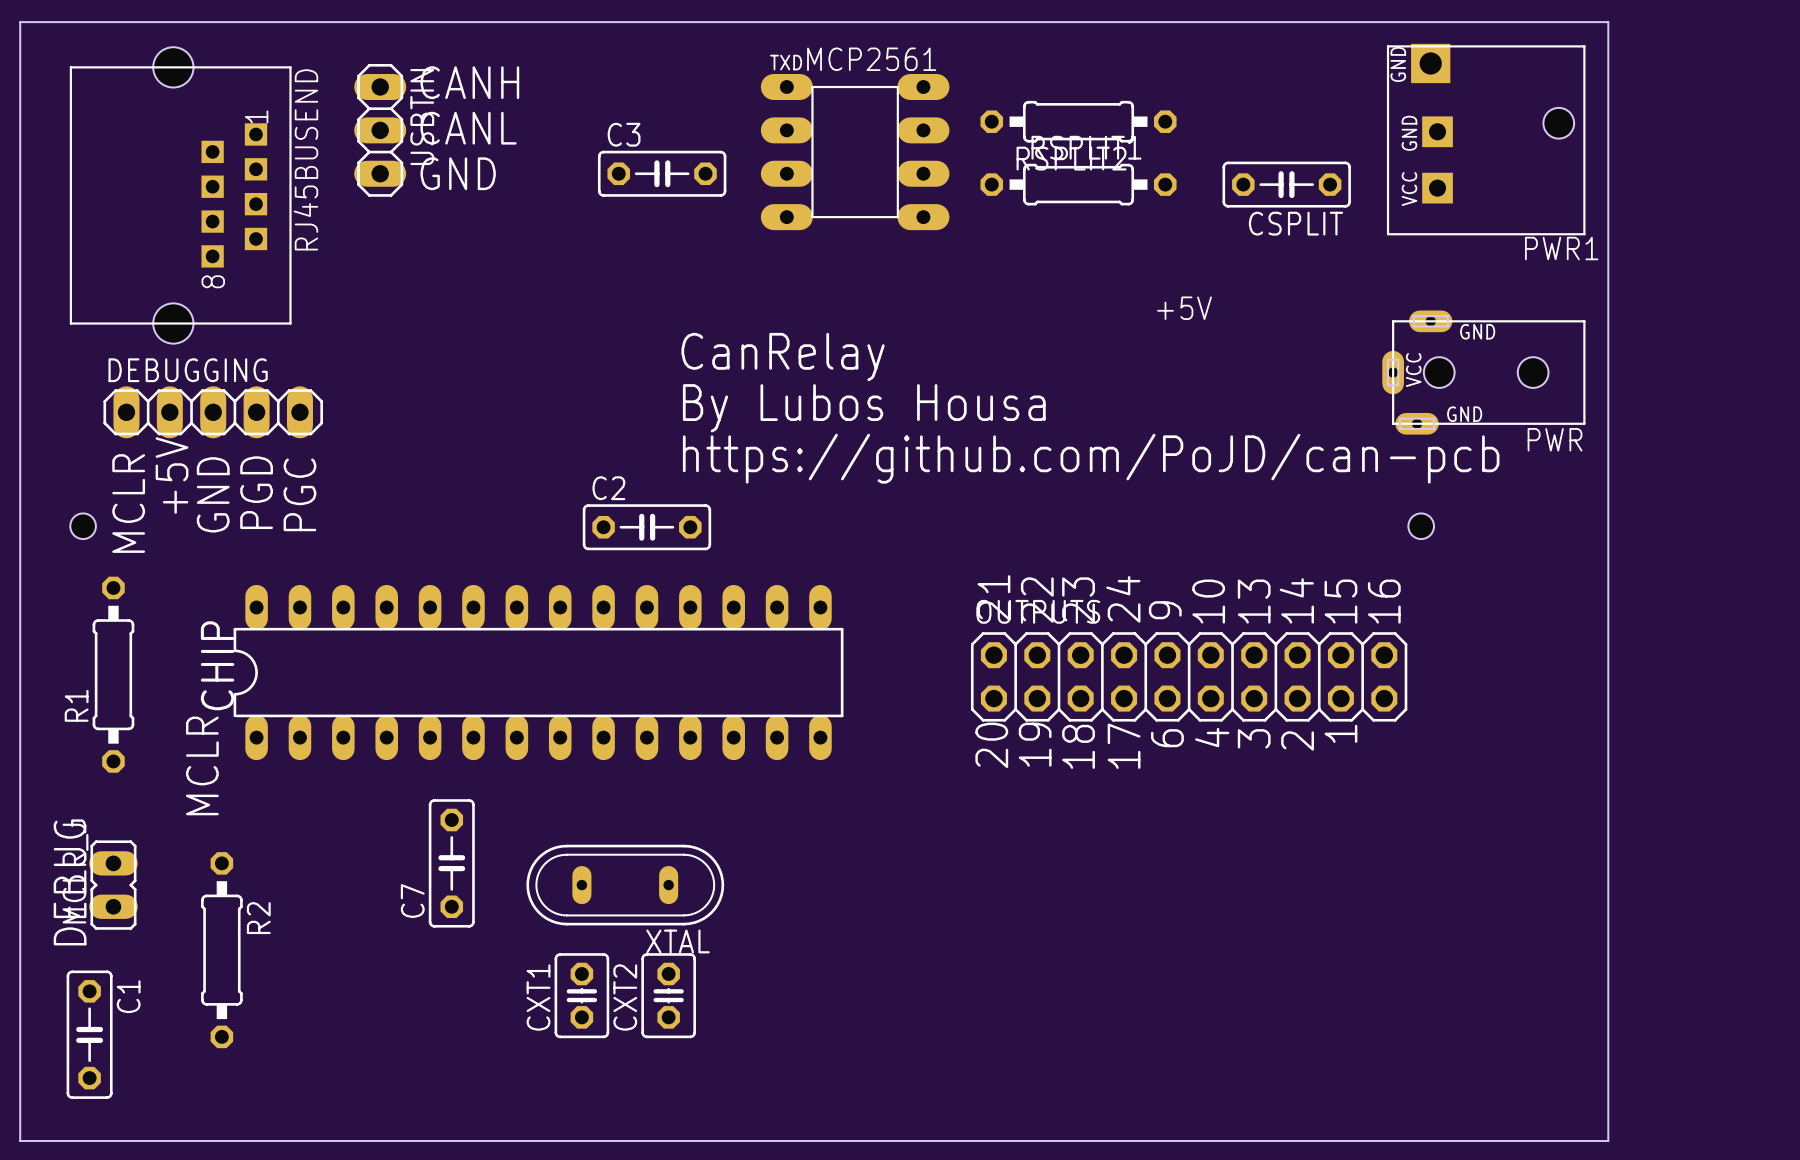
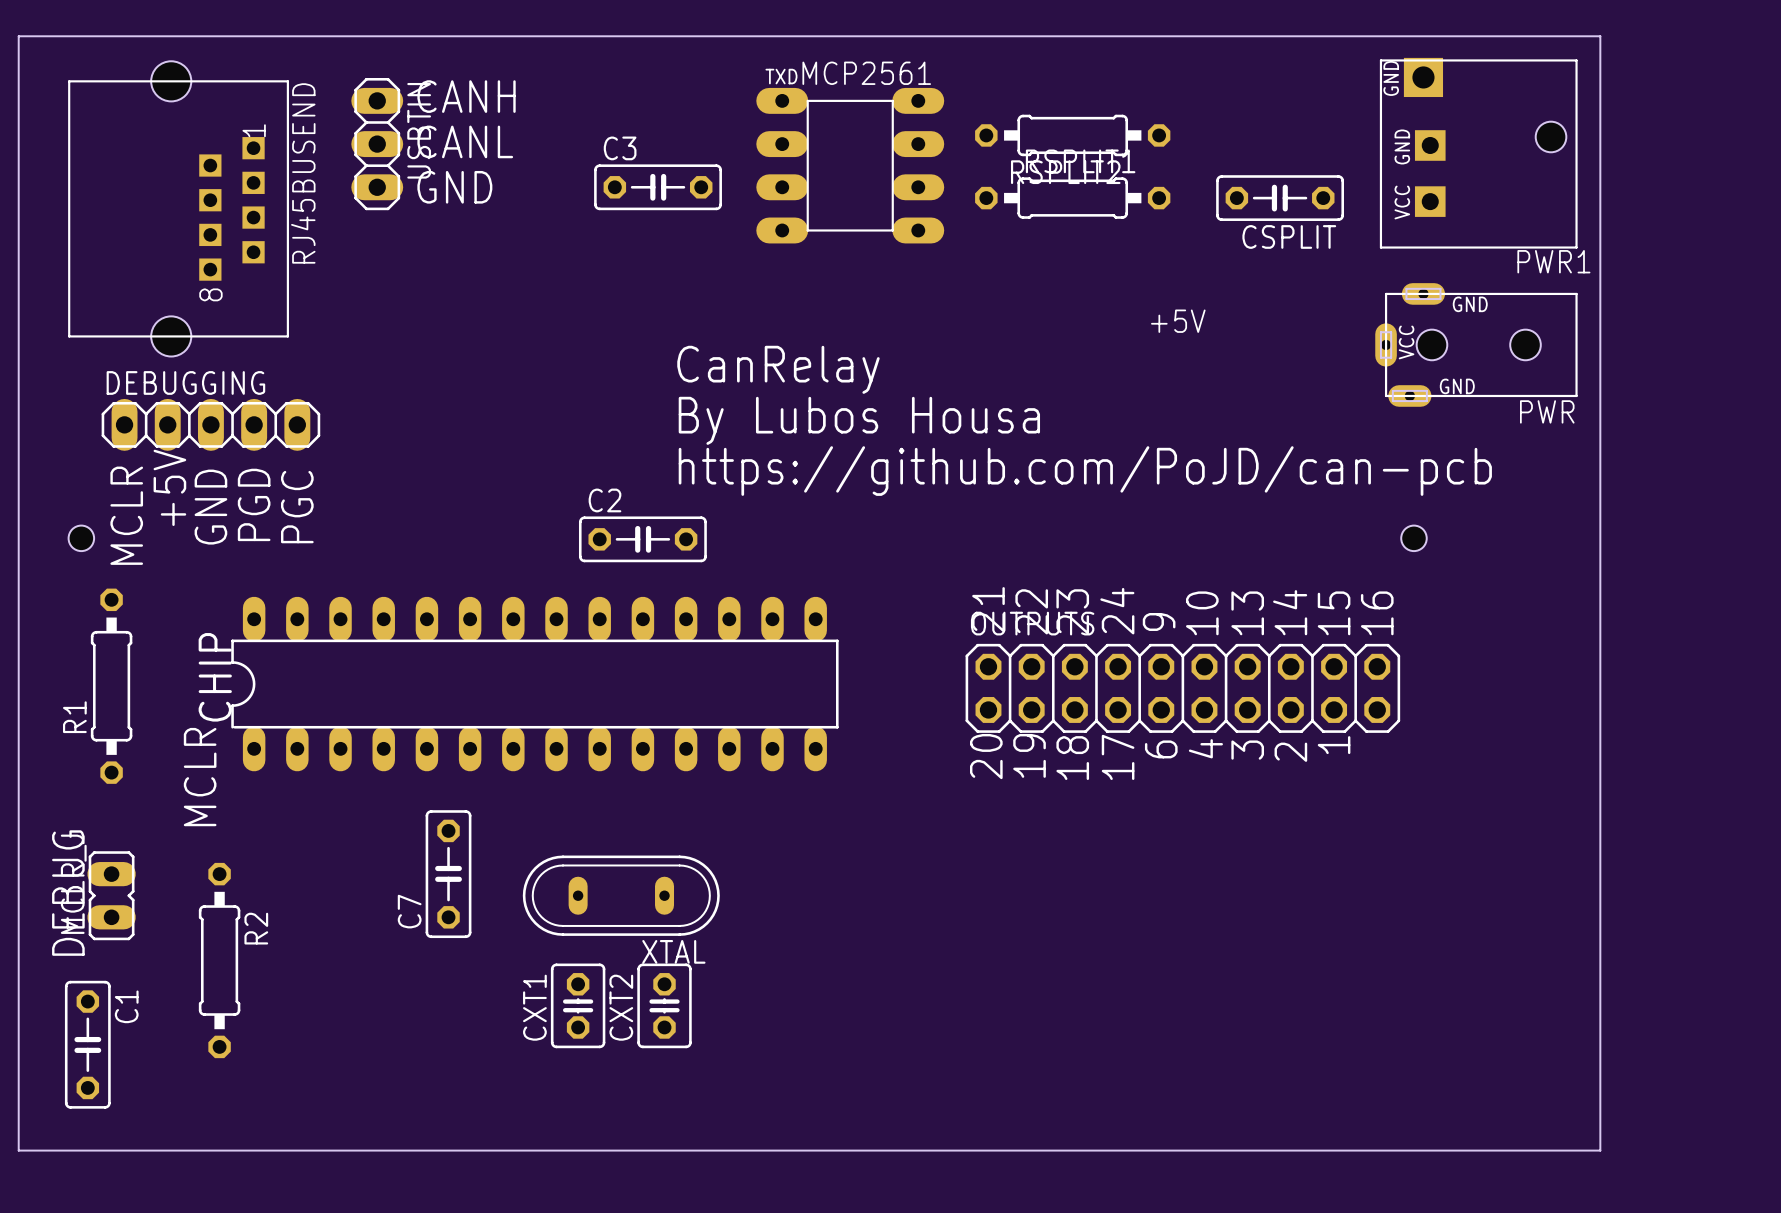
PWR position: (1483, 372) -> (1476, 344)

